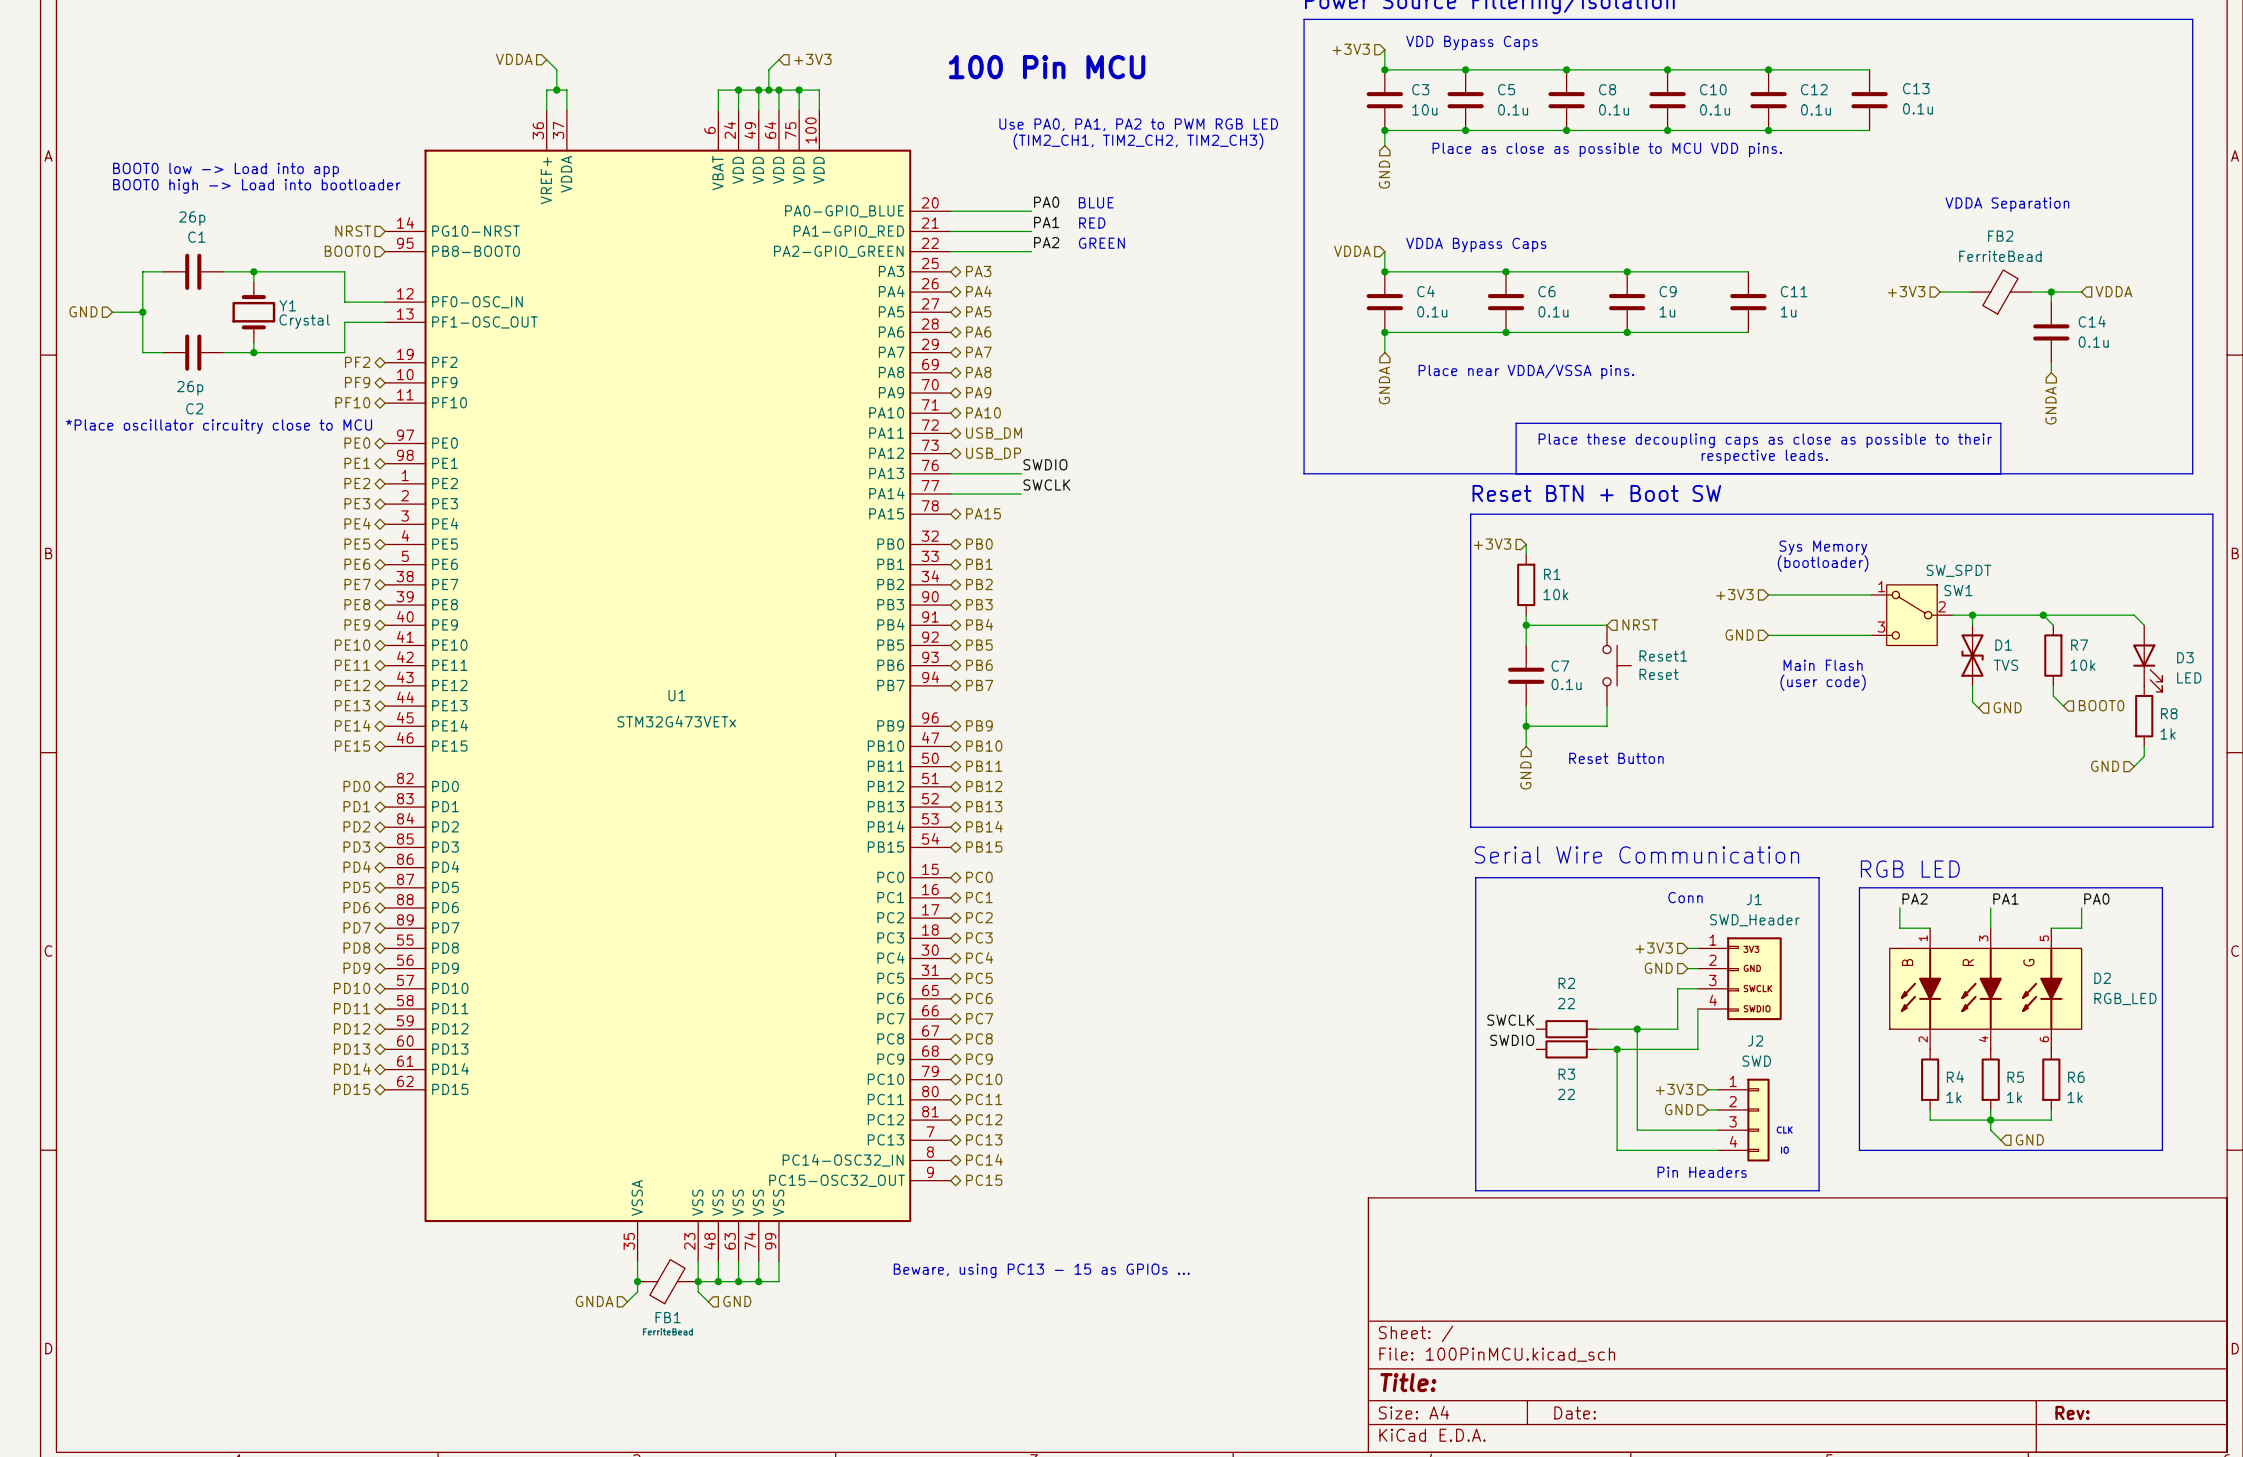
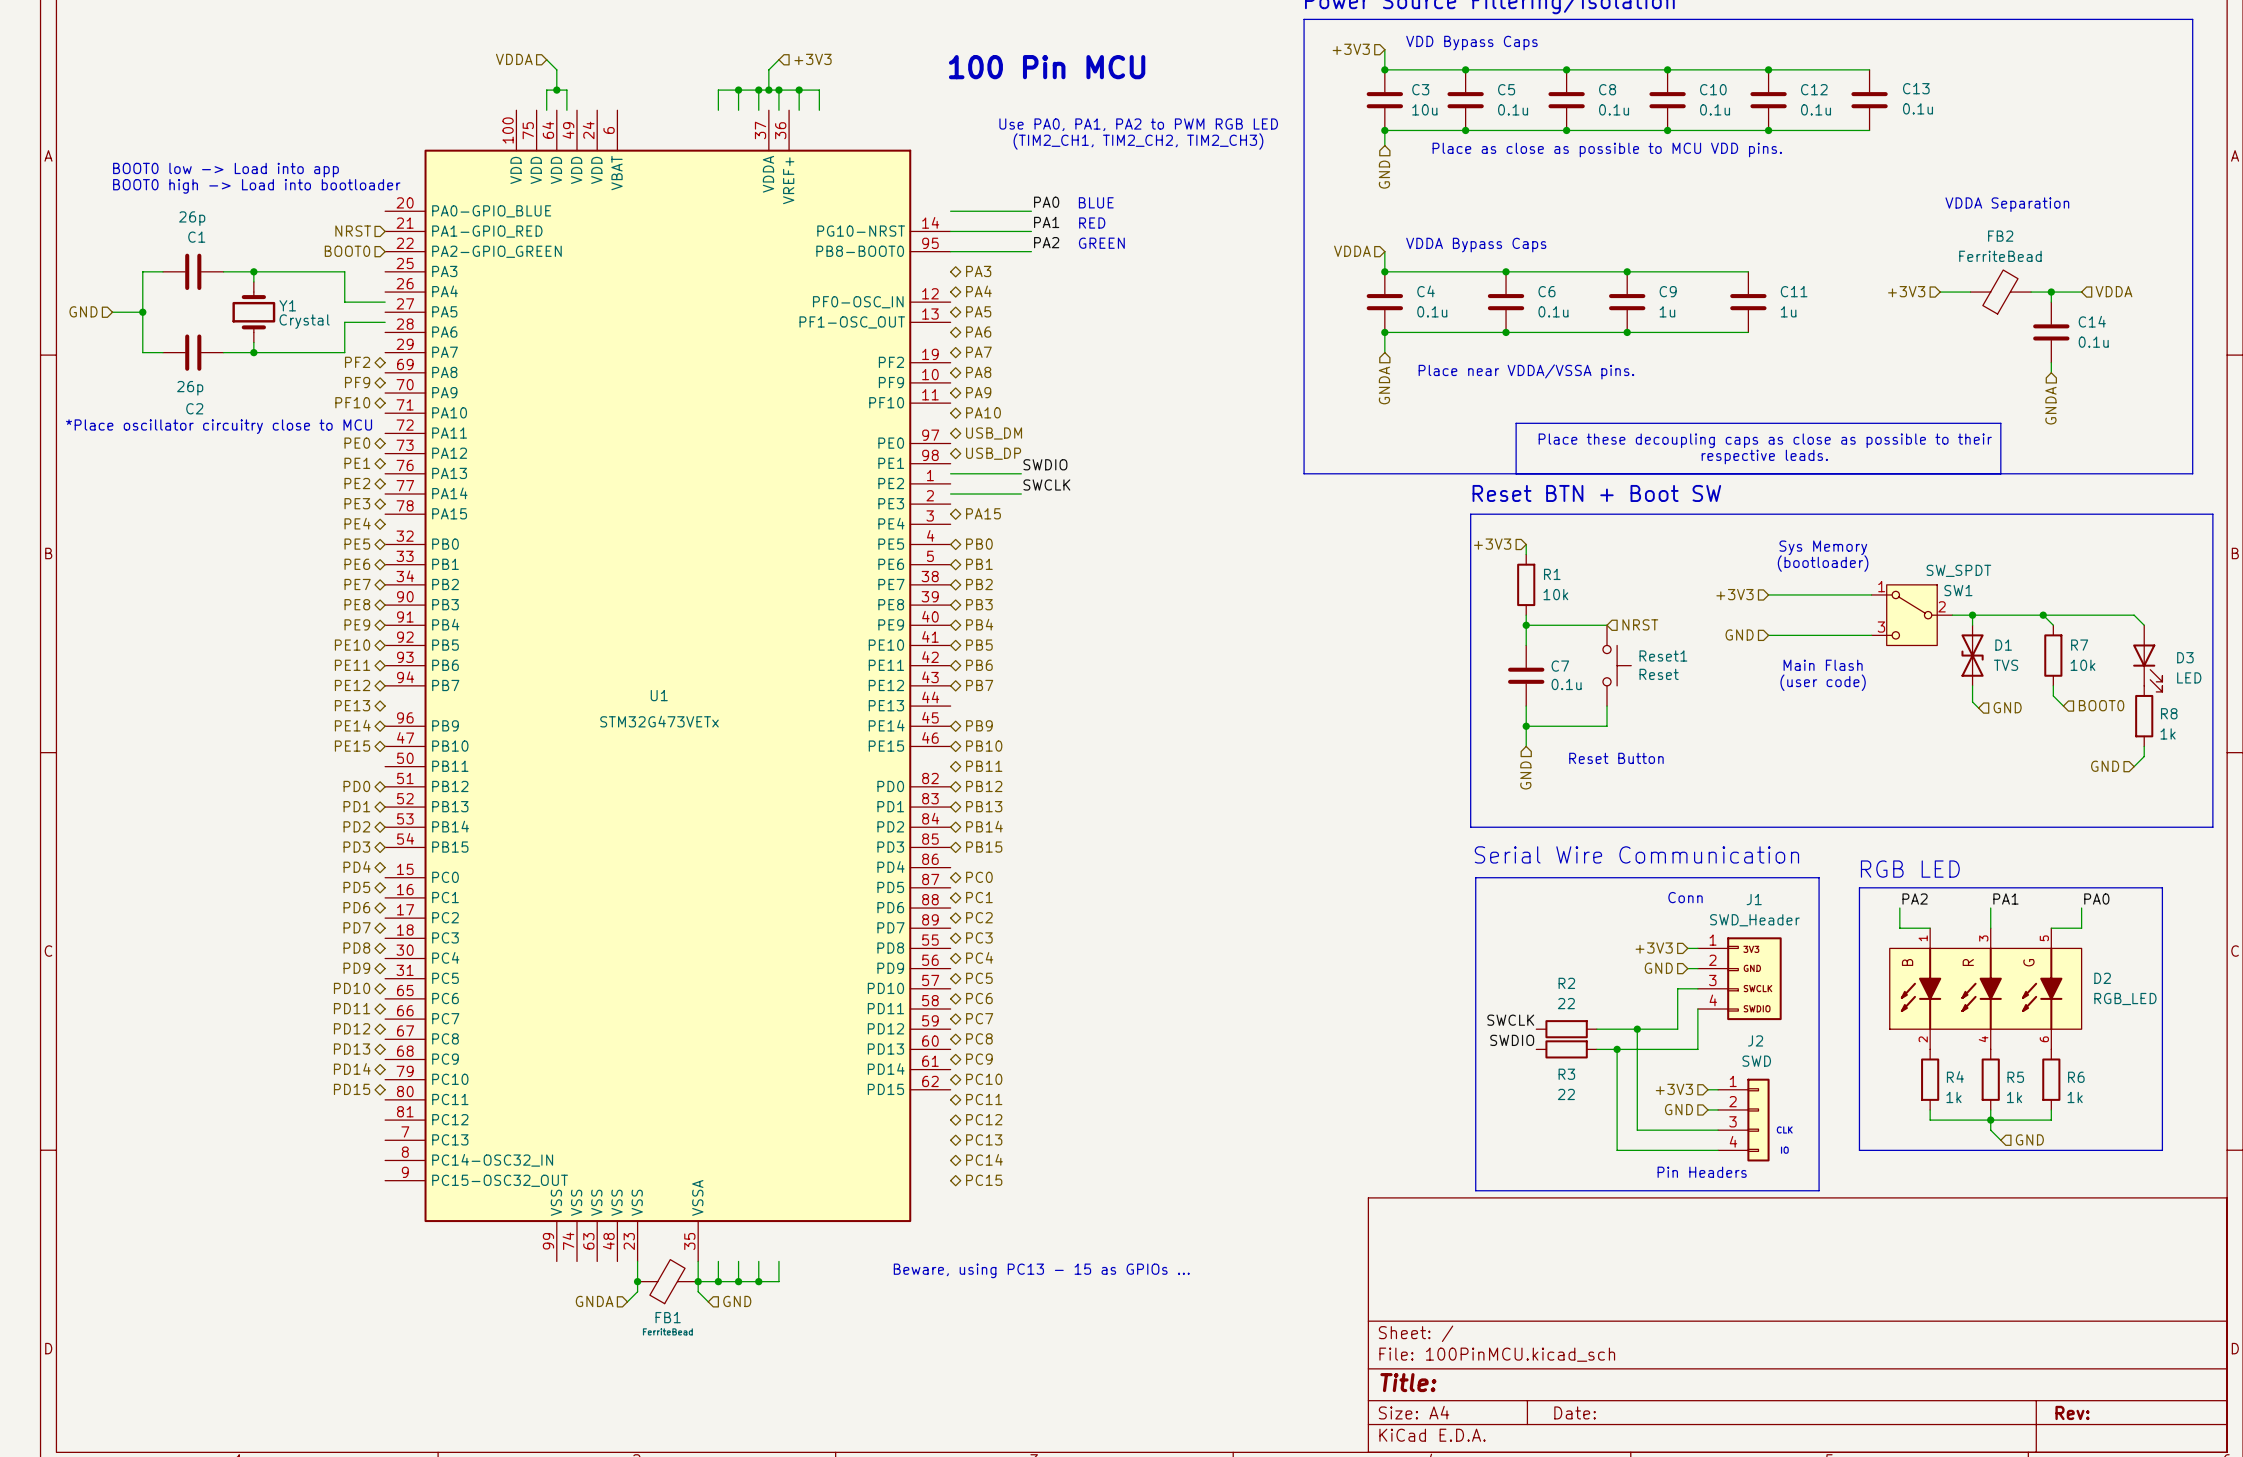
U1 flip: as is (667, 685) -> left-right (667, 685)

